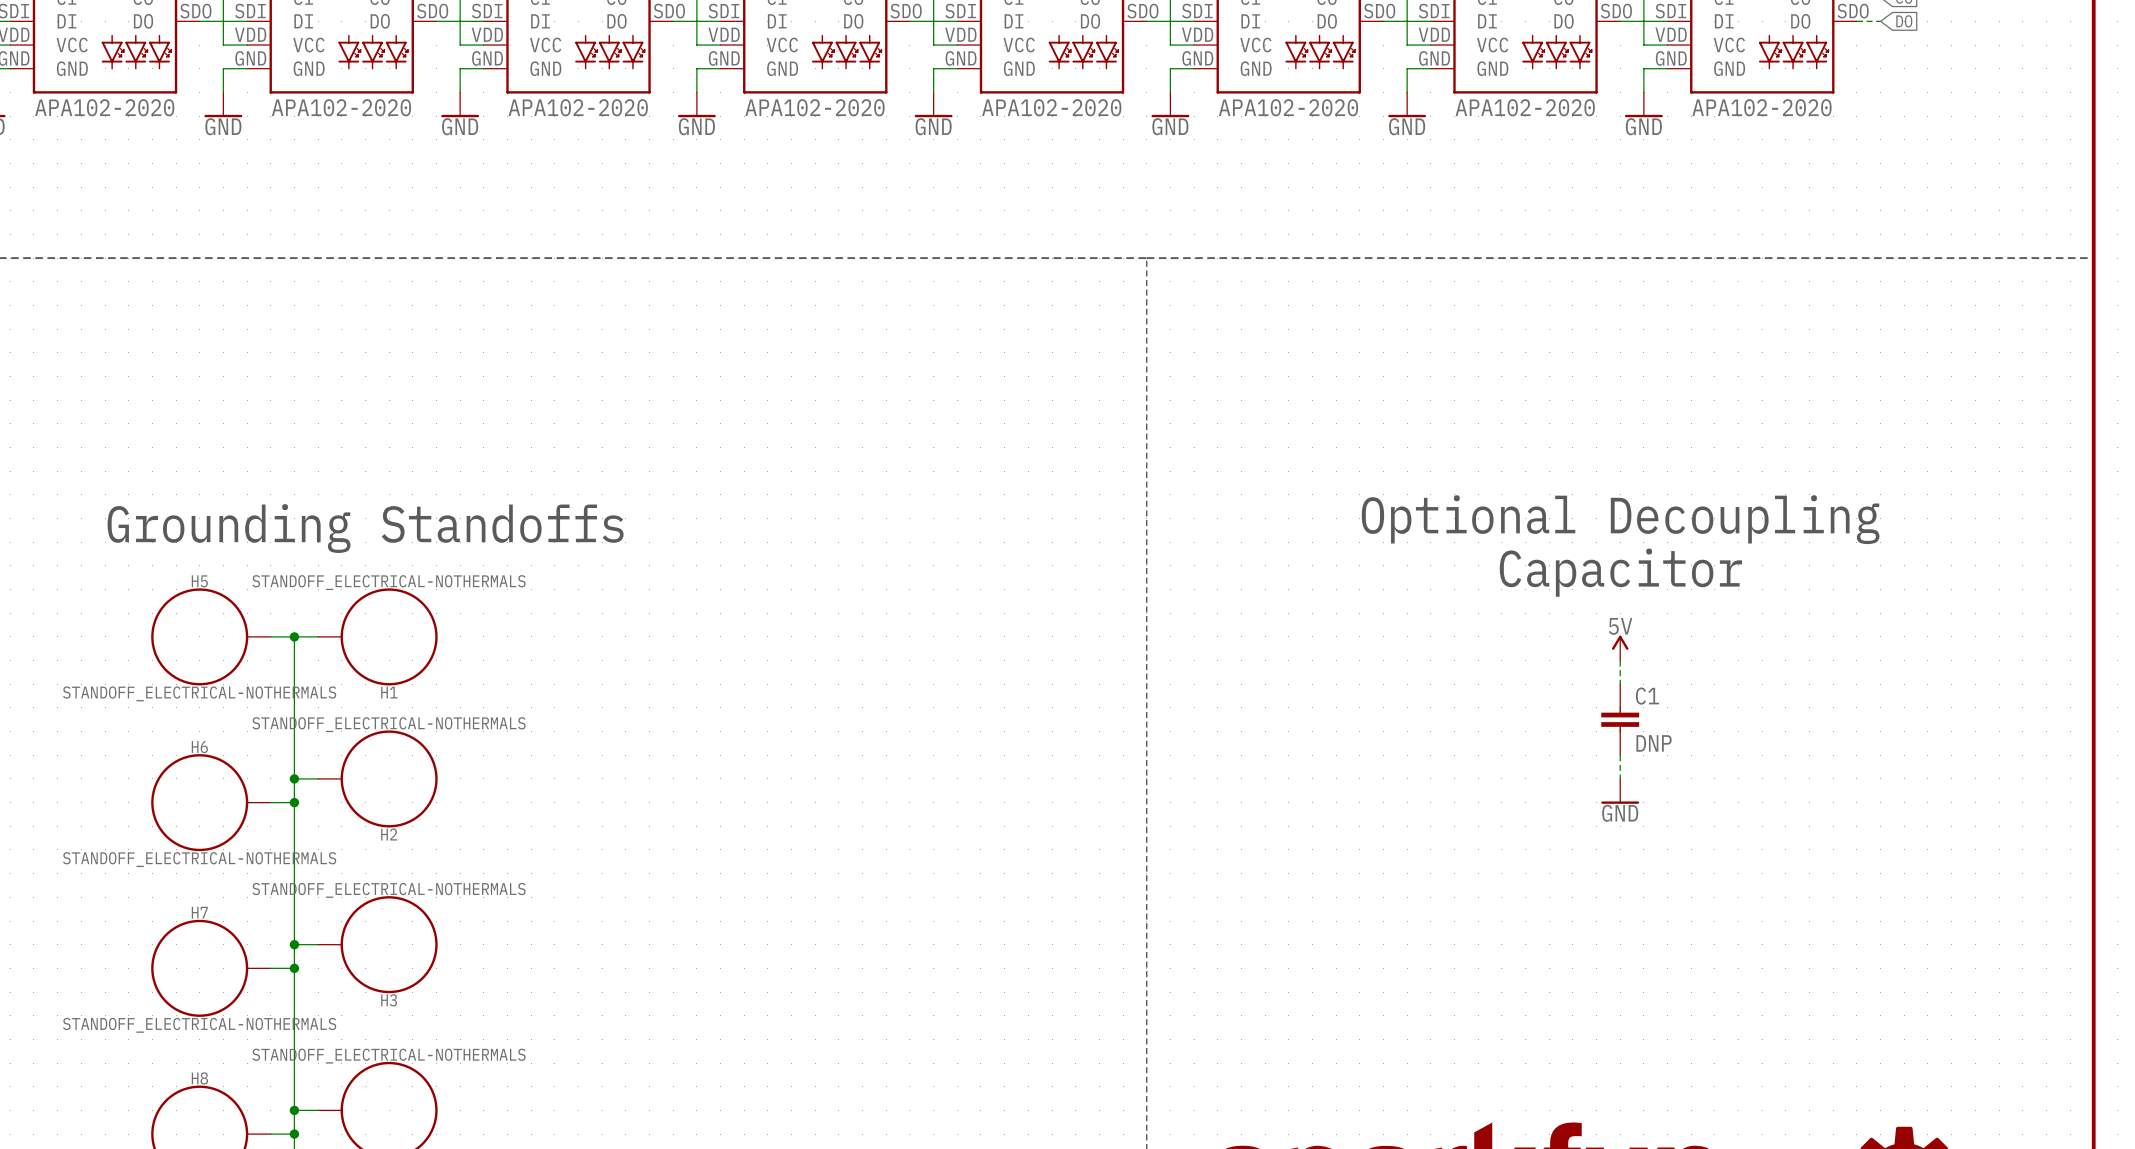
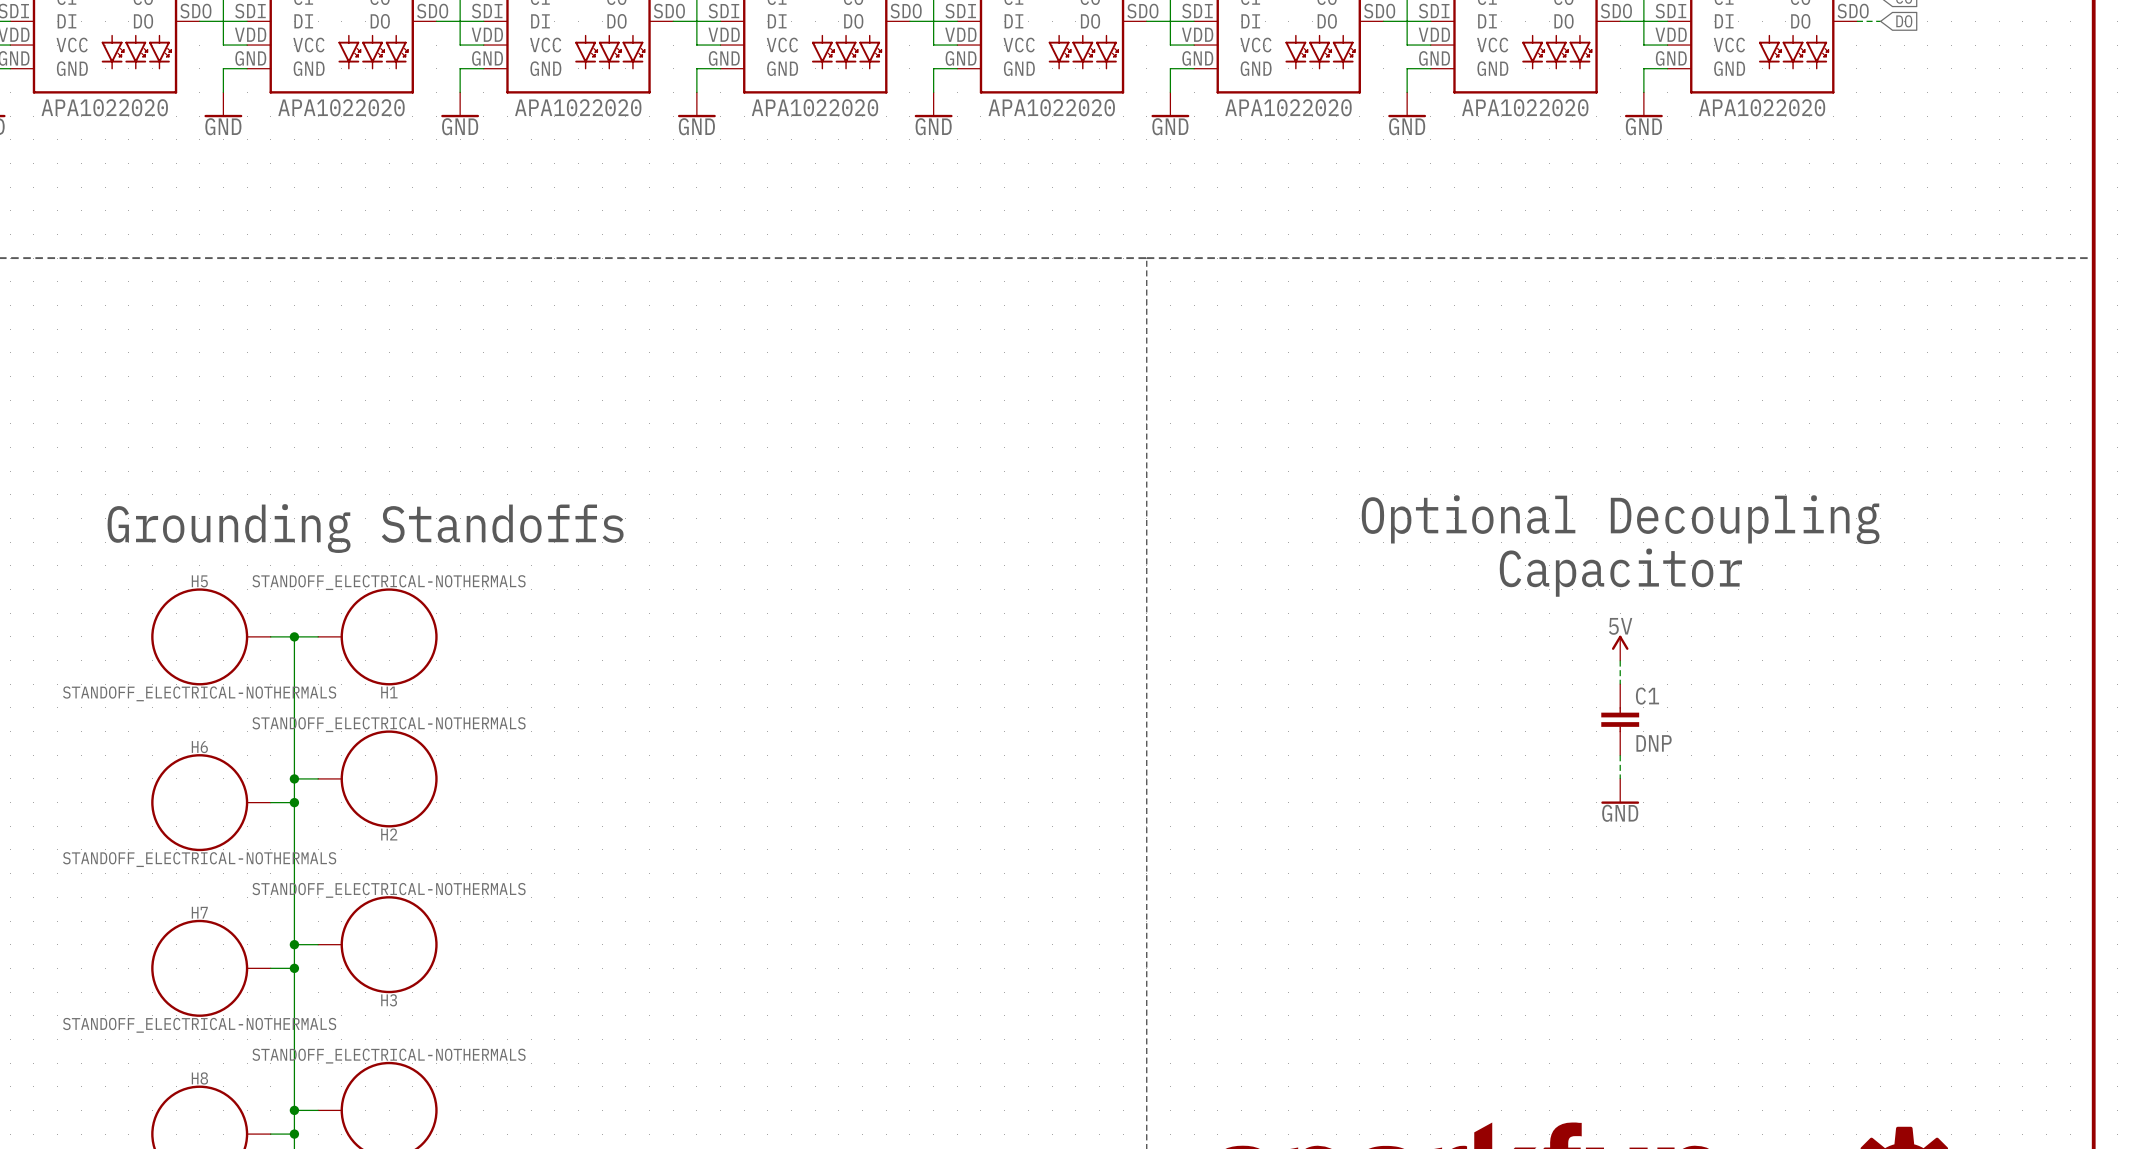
part value: APA102-2020 (104, 107) -> APA1022020 (104, 107)
part value: APA102-2020 (341, 107) -> APA1022020 (341, 107)
part value: APA102-2020 (578, 107) -> APA1022020 (578, 107)
part value: APA102-2020 (814, 107) -> APA1022020 (814, 107)
part value: APA102-2020 (1051, 107) -> APA1022020 (1051, 107)
part value: APA102-2020 (1288, 107) -> APA1022020 (1288, 107)
part value: APA102-2020 (1525, 107) -> APA1022020 (1525, 107)
part value: APA102-2020 (1762, 107) -> APA1022020 (1762, 107)

